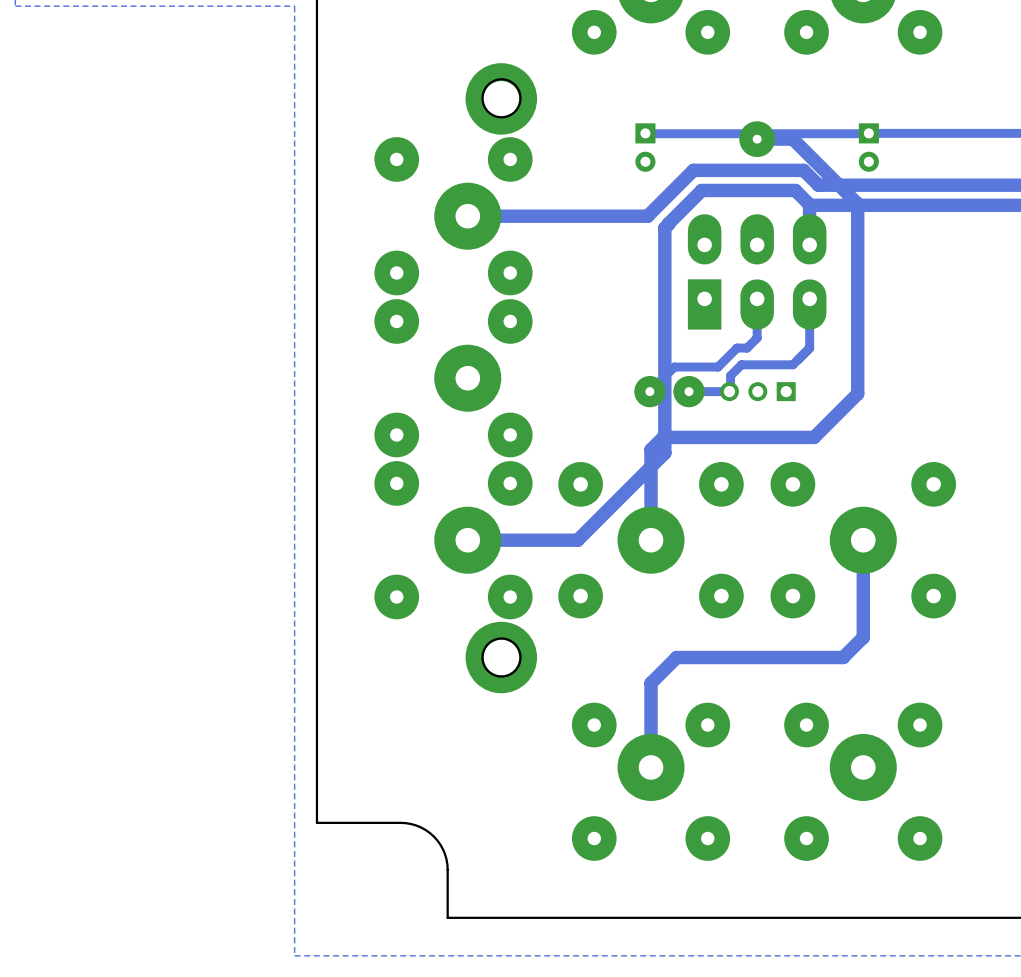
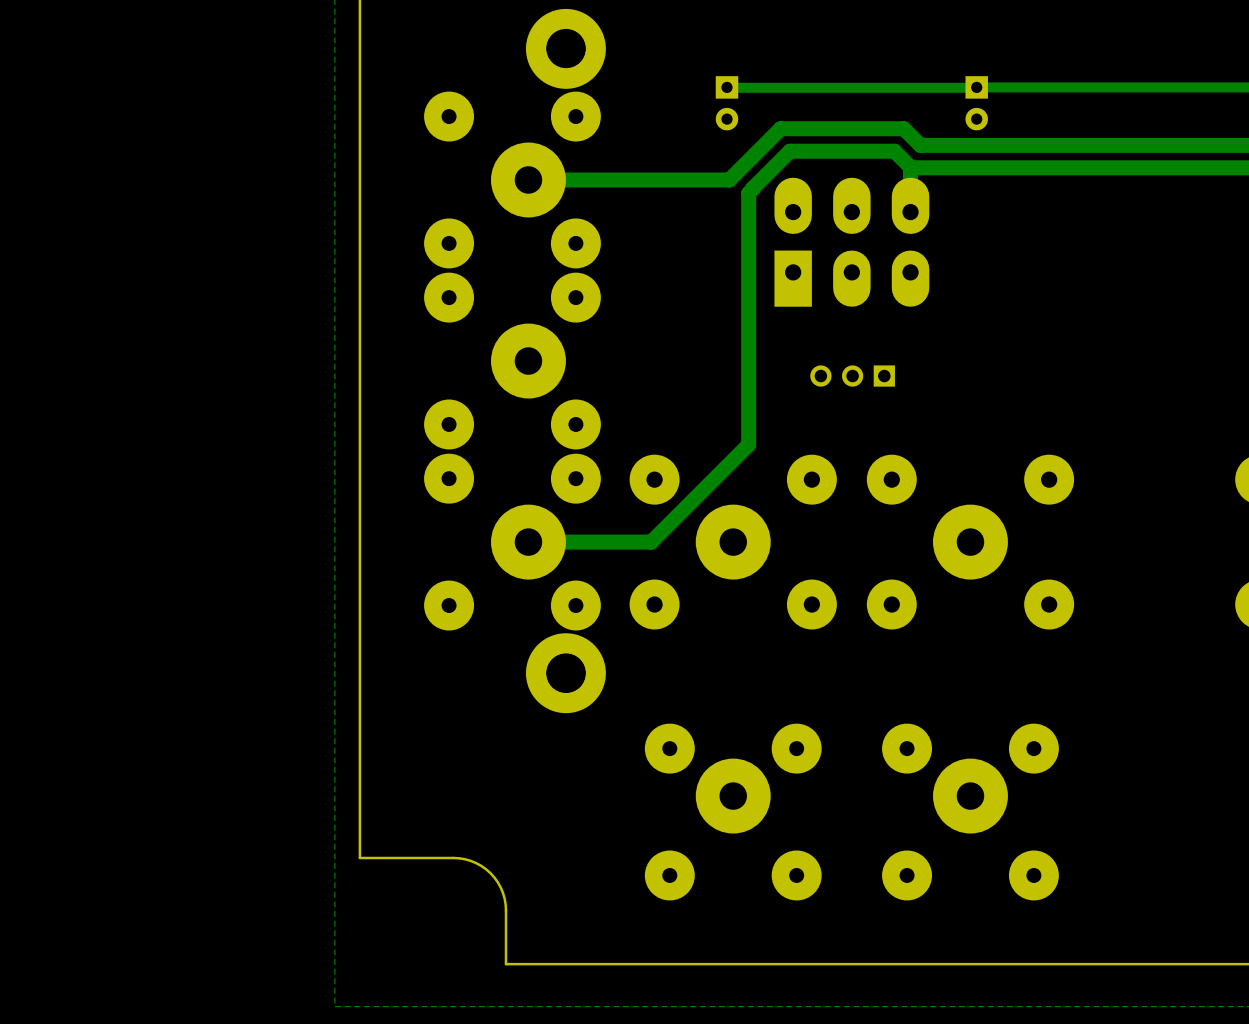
track: (757, 139) (792, 139) (857, 203) (857, 393) (814, 437) (663, 437) (651, 449) (651, 540) -> none
via: (757, 139) -> none
track: (757, 298) (757, 337) (747, 348) (737, 348) (718, 367) (674, 367) (649, 391) -> none
track: (809, 298) (809, 348) (792, 364) (741, 364) (730, 375) (730, 391) (689, 391) -> none
via: (649, 391) -> none
via: (689, 391) -> none
track: (863, 540) (863, 637) (843, 657) (676, 657) (651, 683) (651, 767) -> none

